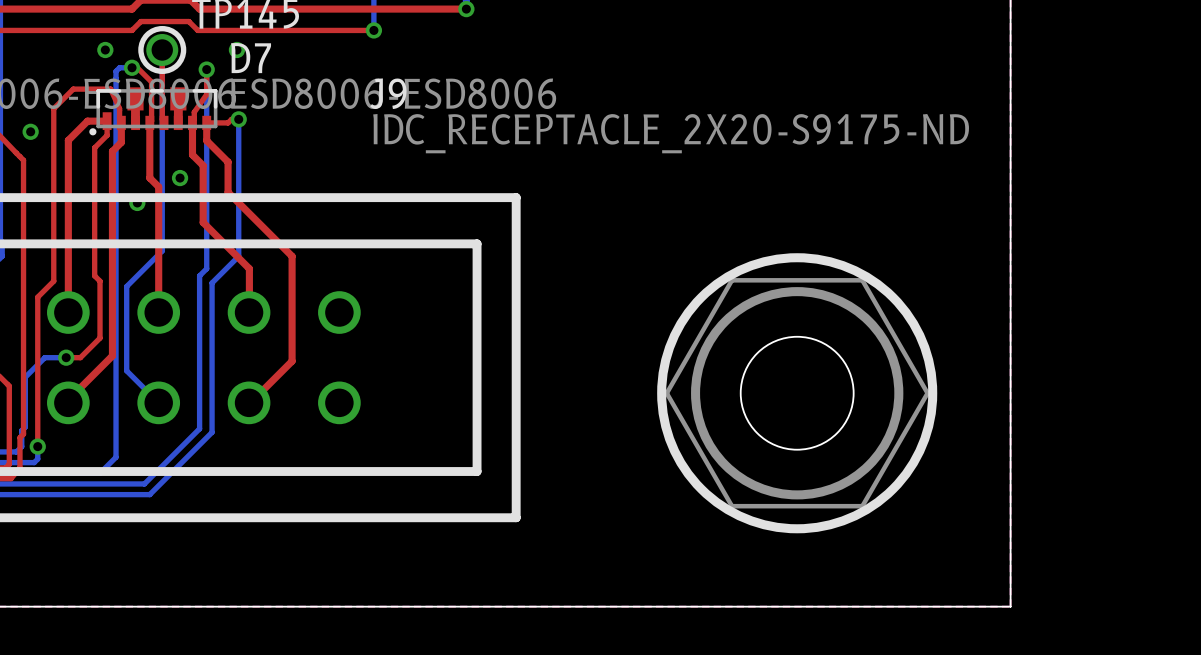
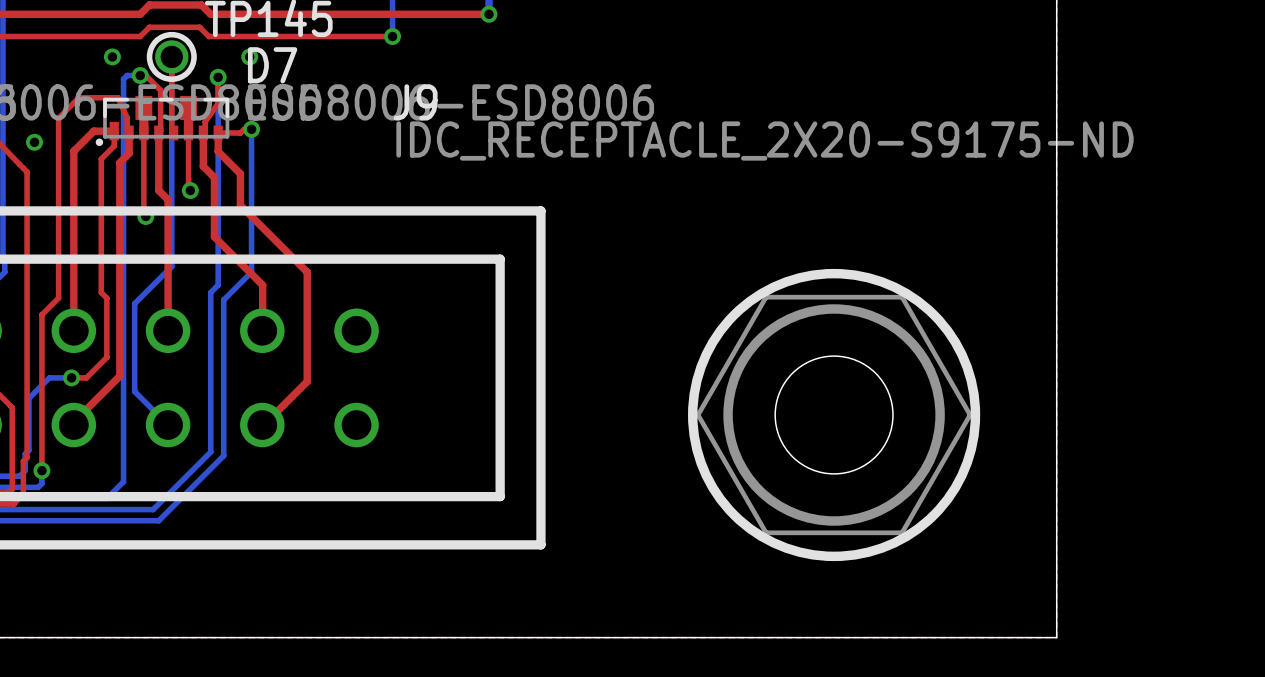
top track: none -> (143, 107) (143, 214) (145, 216)
top track: none -> (188, 132) (188, 188) (190, 190)

